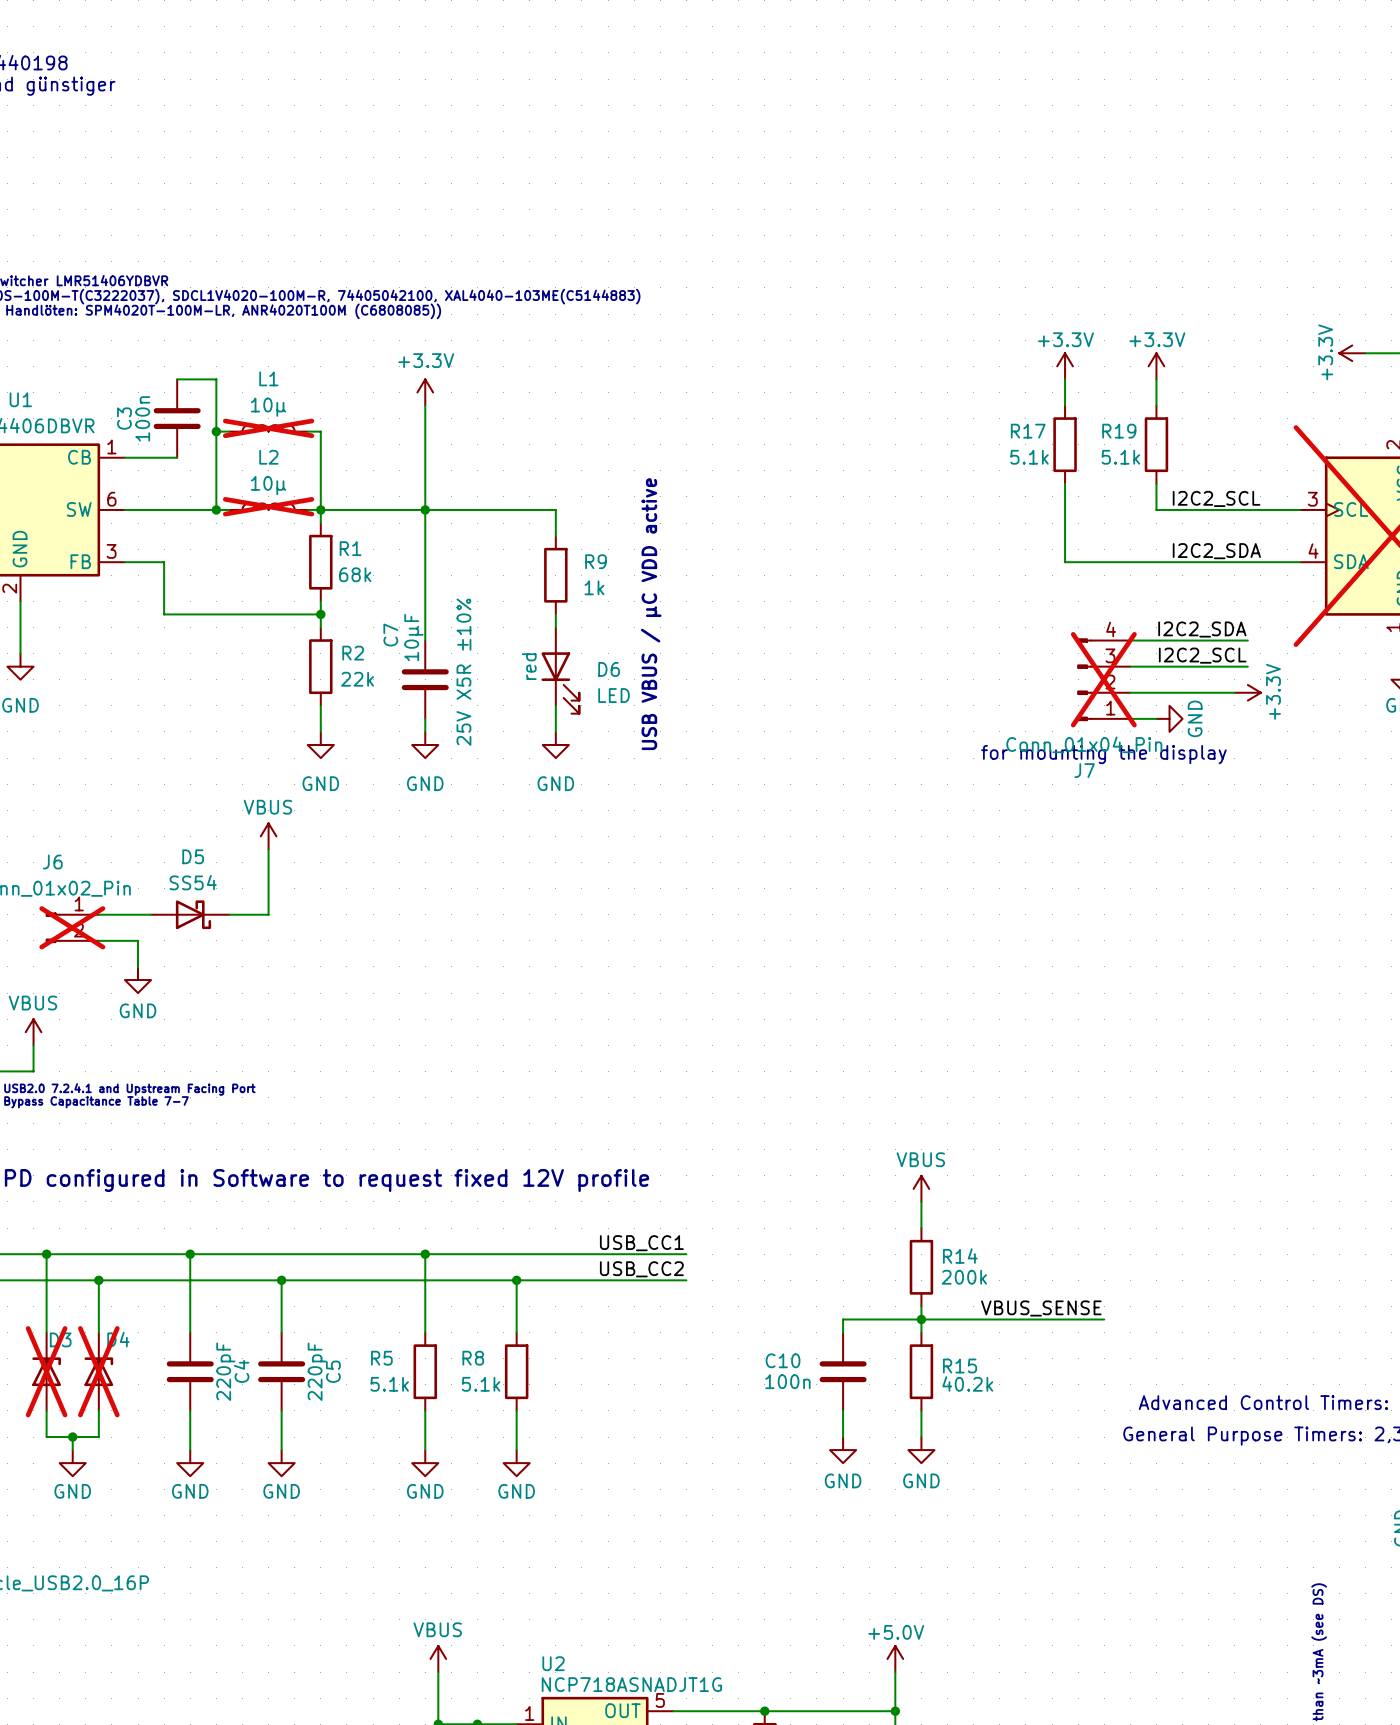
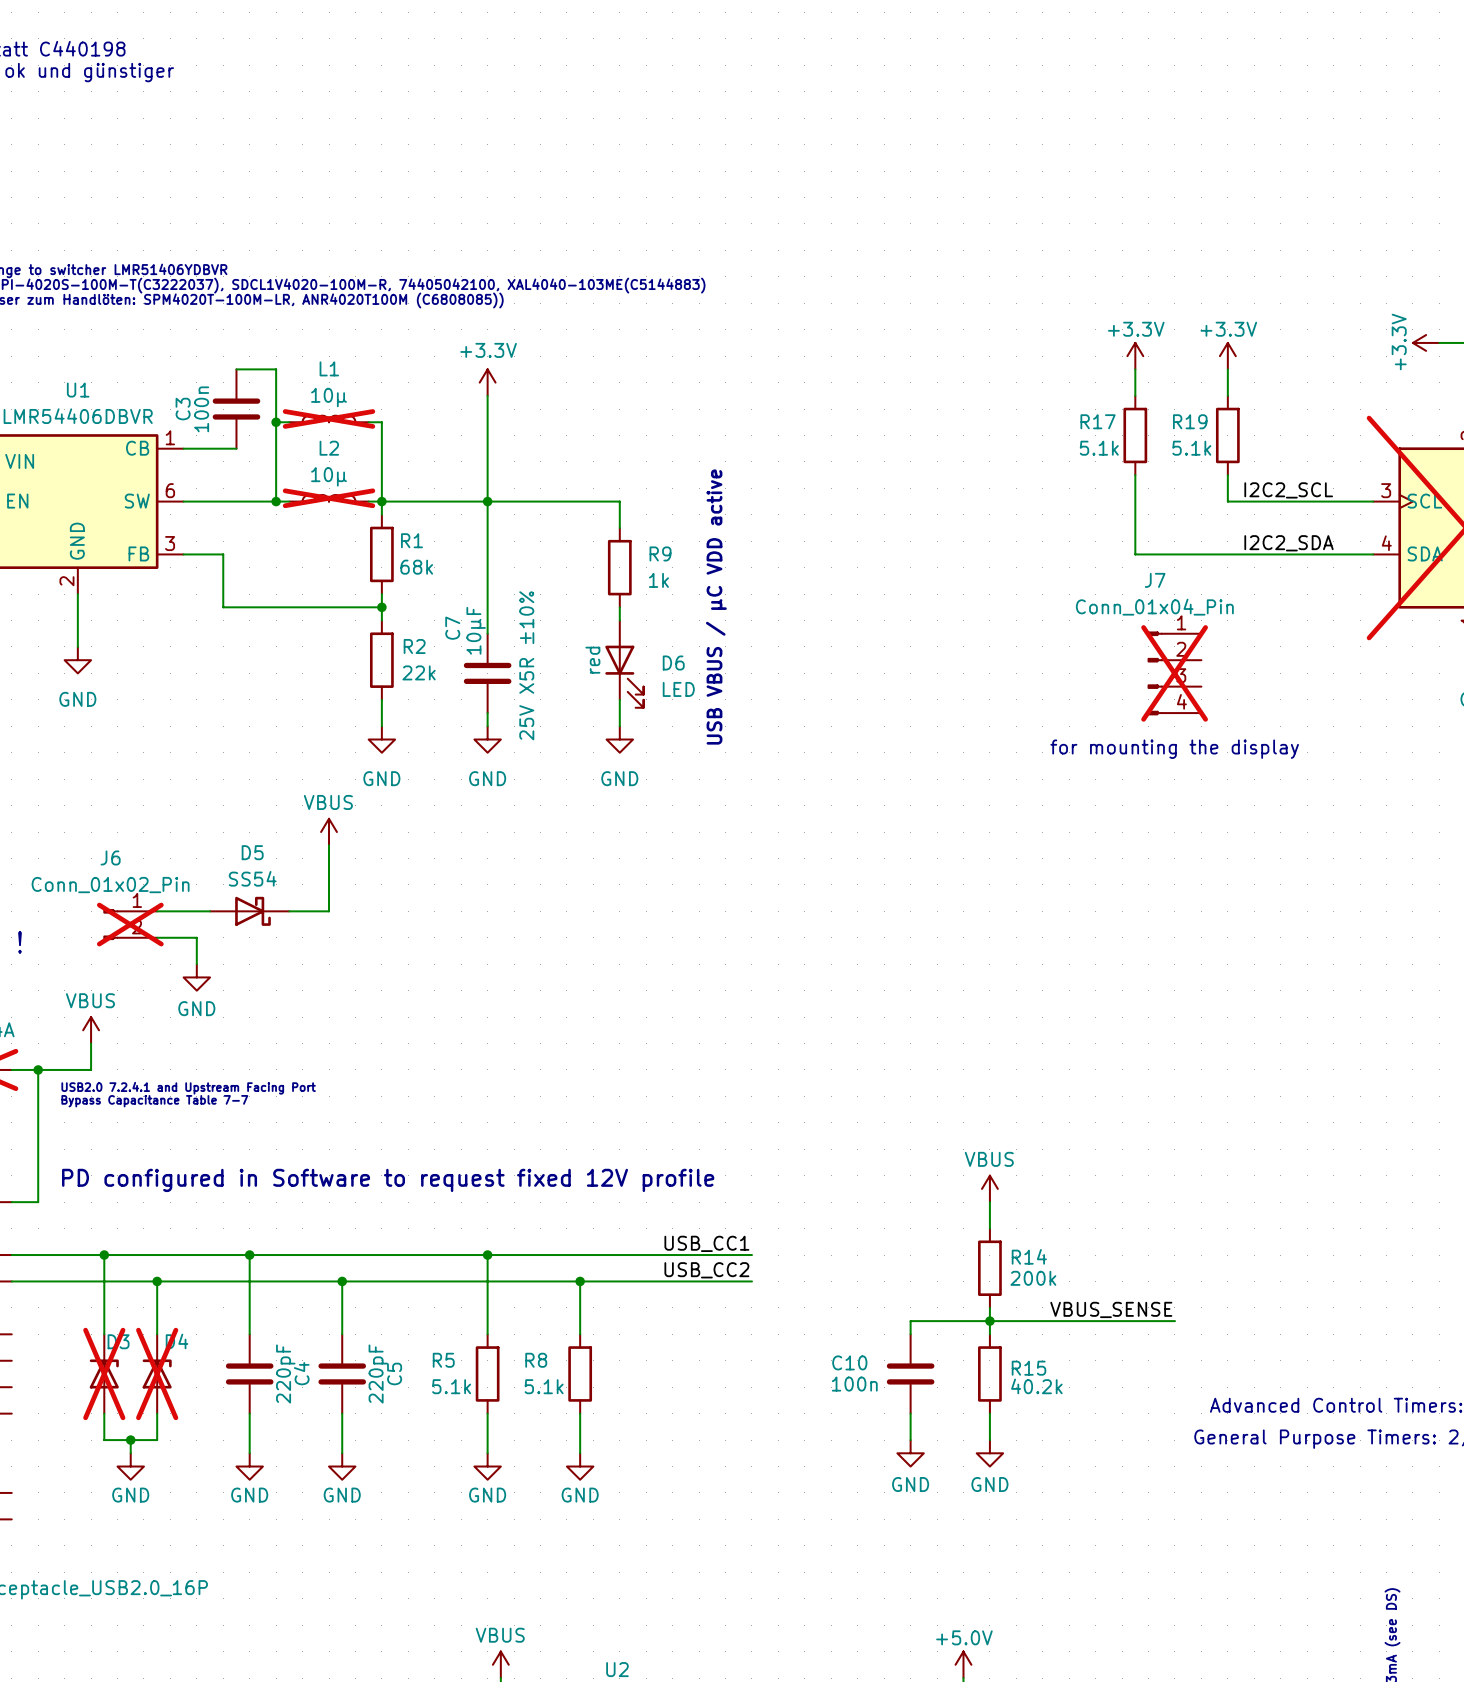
label: I2C2_SDA (1202, 629) -> none
wire: (1130, 640) (1247, 640) -> none
label: I2C2_SCL (1202, 655) -> none
wire: (1130, 666) (1247, 666) -> none
J7 flip: as is (1084, 679) -> up-down (1155, 673)
wire: (1130, 692) (1234, 692) -> none
power symbol: +3.3V (1247, 692) -> none
wire: (1130, 718) (1156, 718) -> none
power symbol: GND (1169, 718) -> none

